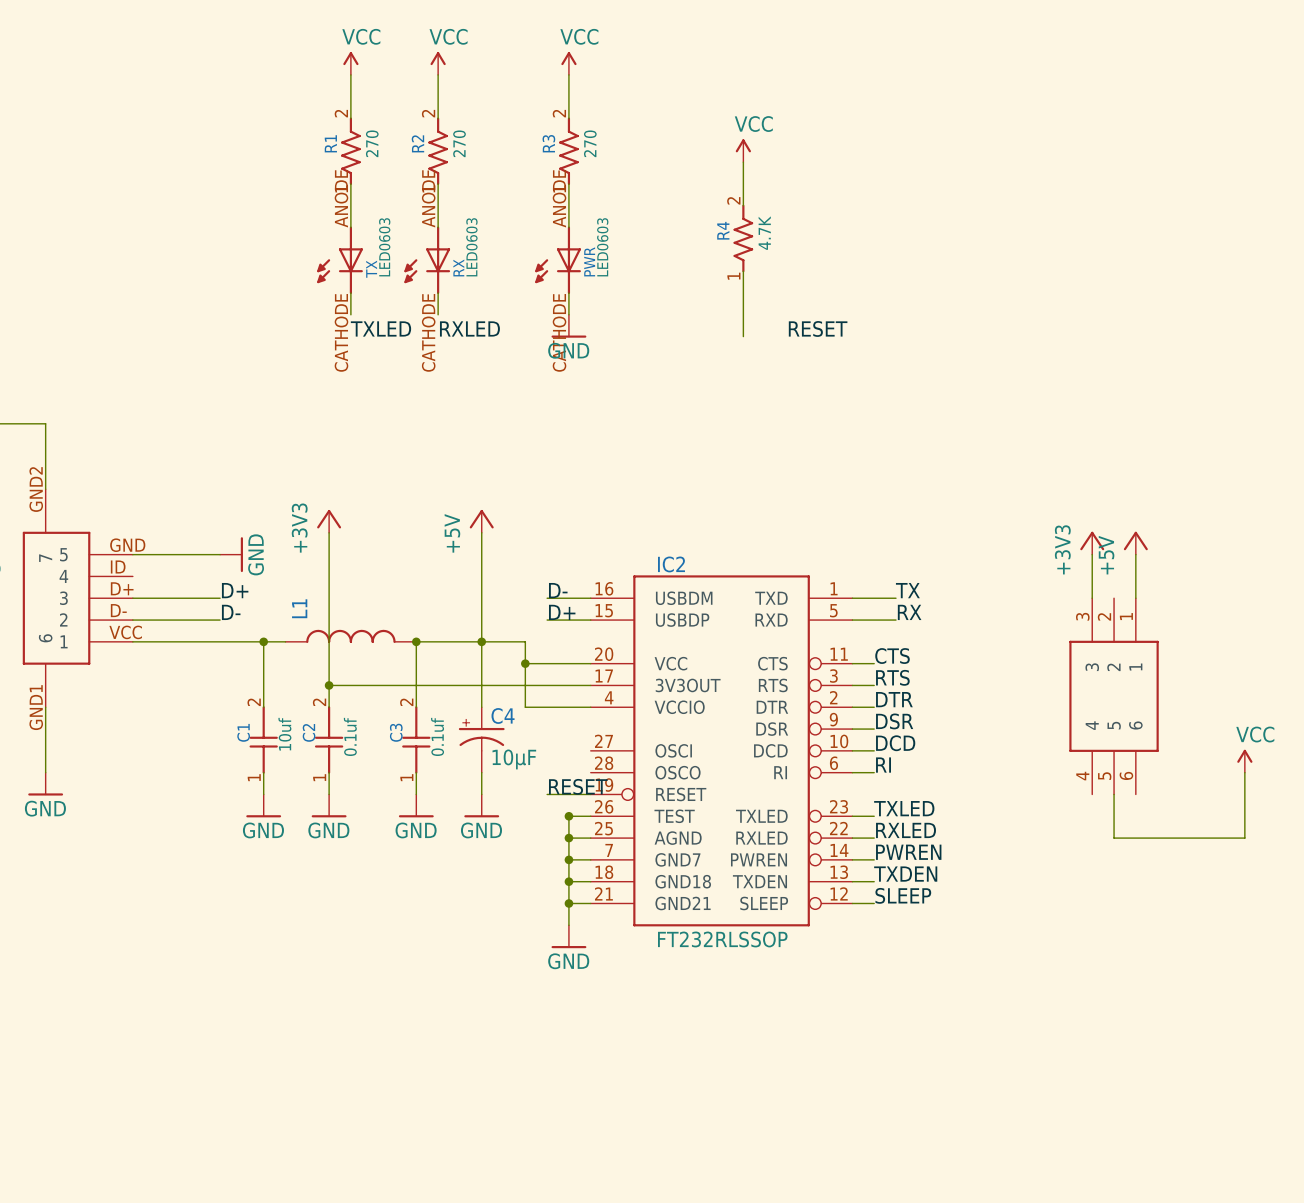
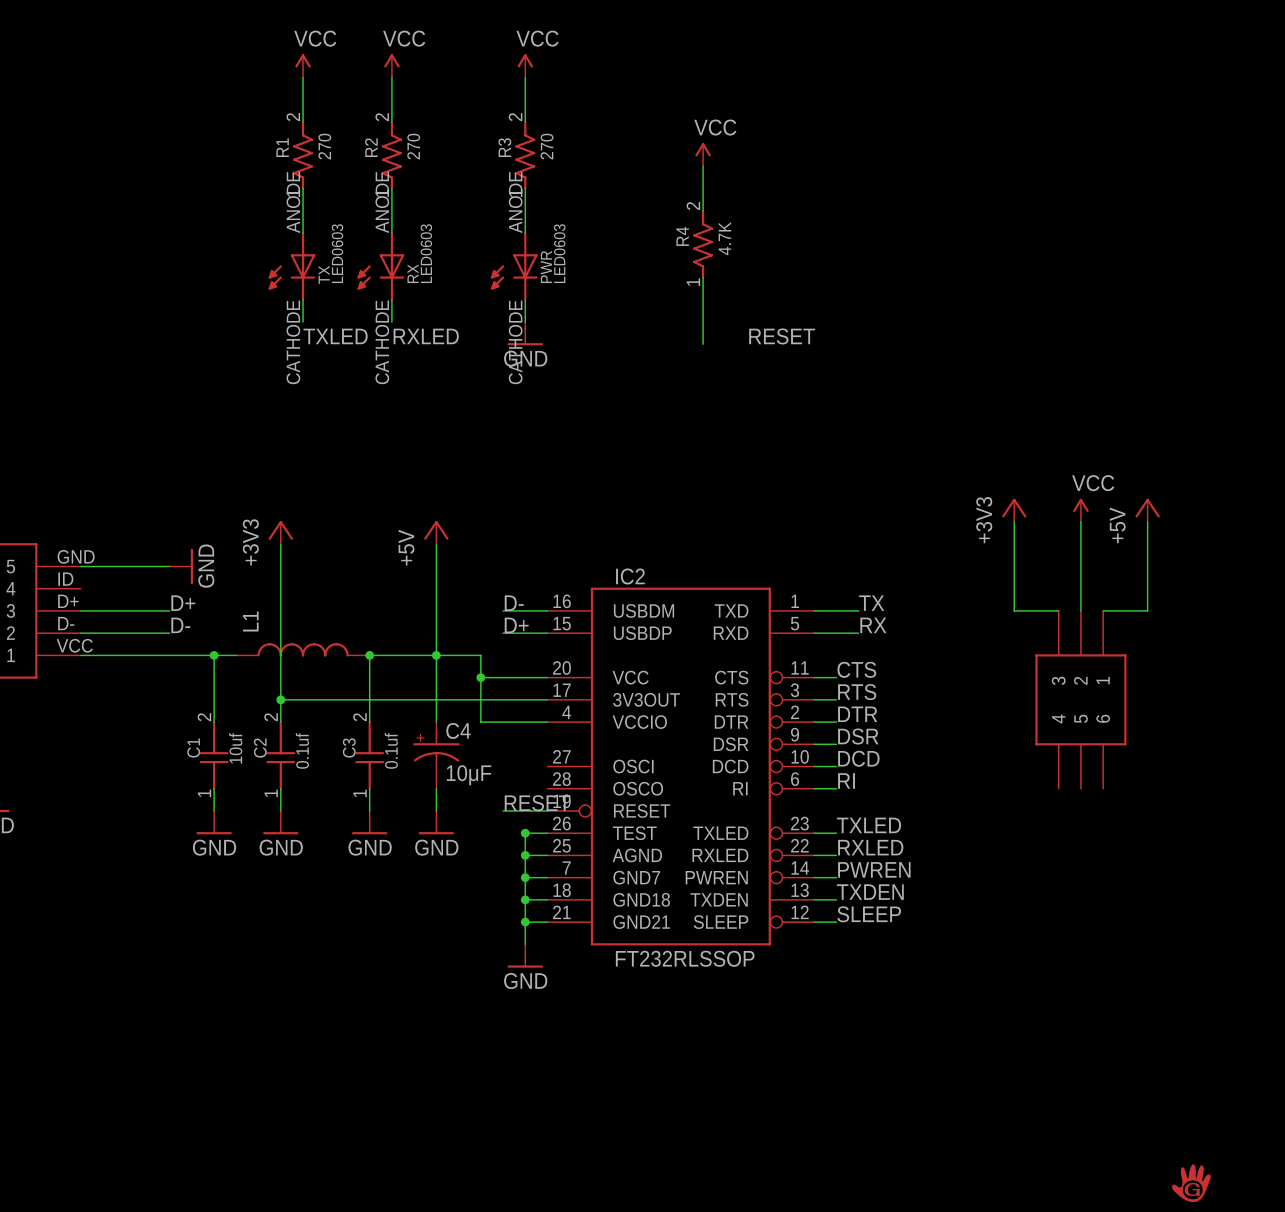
power symbol: none -> VCC (1080, 510)
wire: none -> (1080, 522) (1080, 610)
power symbol position: +3V3 (1092, 543) -> +3V3 (1014, 510)
power symbol position: +5V (1135, 543) -> +5V (1147, 510)
wire: (1092, 554) (1092, 598) -> (1014, 522) (1014, 610) (1058, 610)
wire: (1135, 554) (1135, 598) -> (1147, 522) (1147, 610) (1103, 610)
part: none -> (1080, 699)
part: (1114, 696) -> none
power symbol: VCC (1244, 761) -> none
wire: (1244, 772) (1244, 838) (1114, 838) (1114, 794) -> none
part: none -> (1191, 1183)

